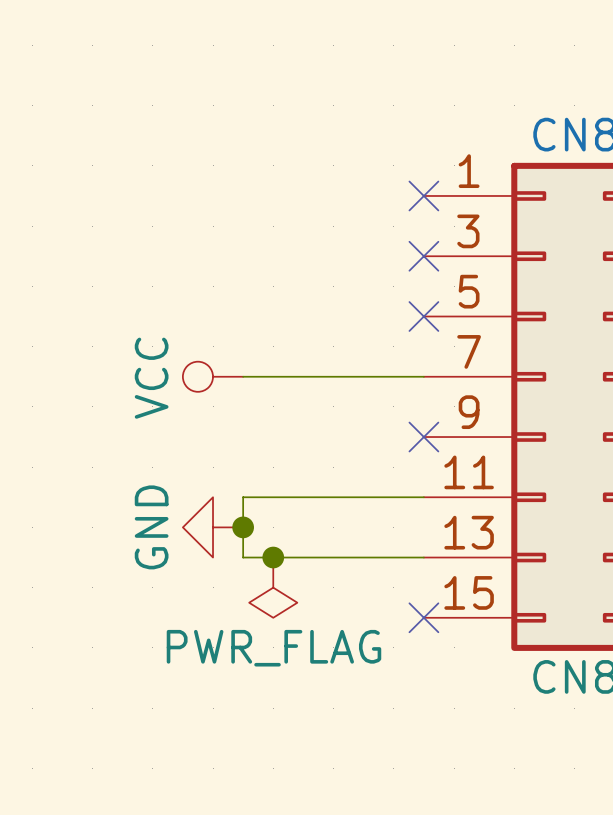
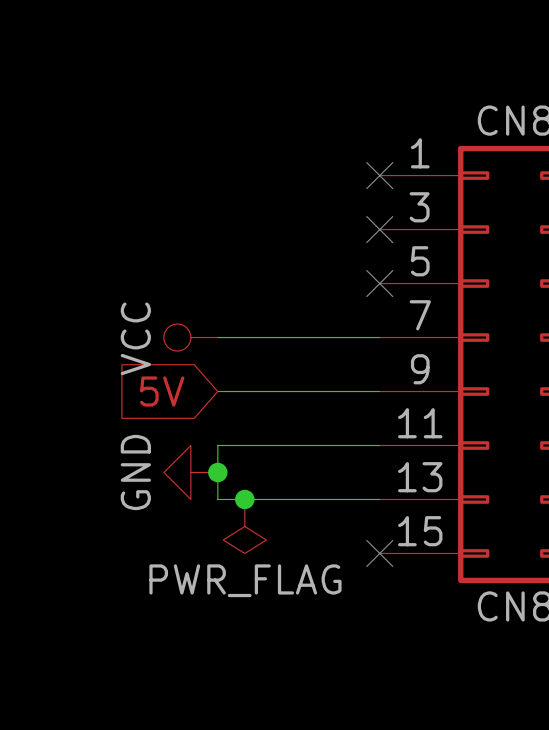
global label: none -> 5V (162, 391)
wire: none -> (217, 391) (379, 391)
no-connect mark: (423, 437) -> none

